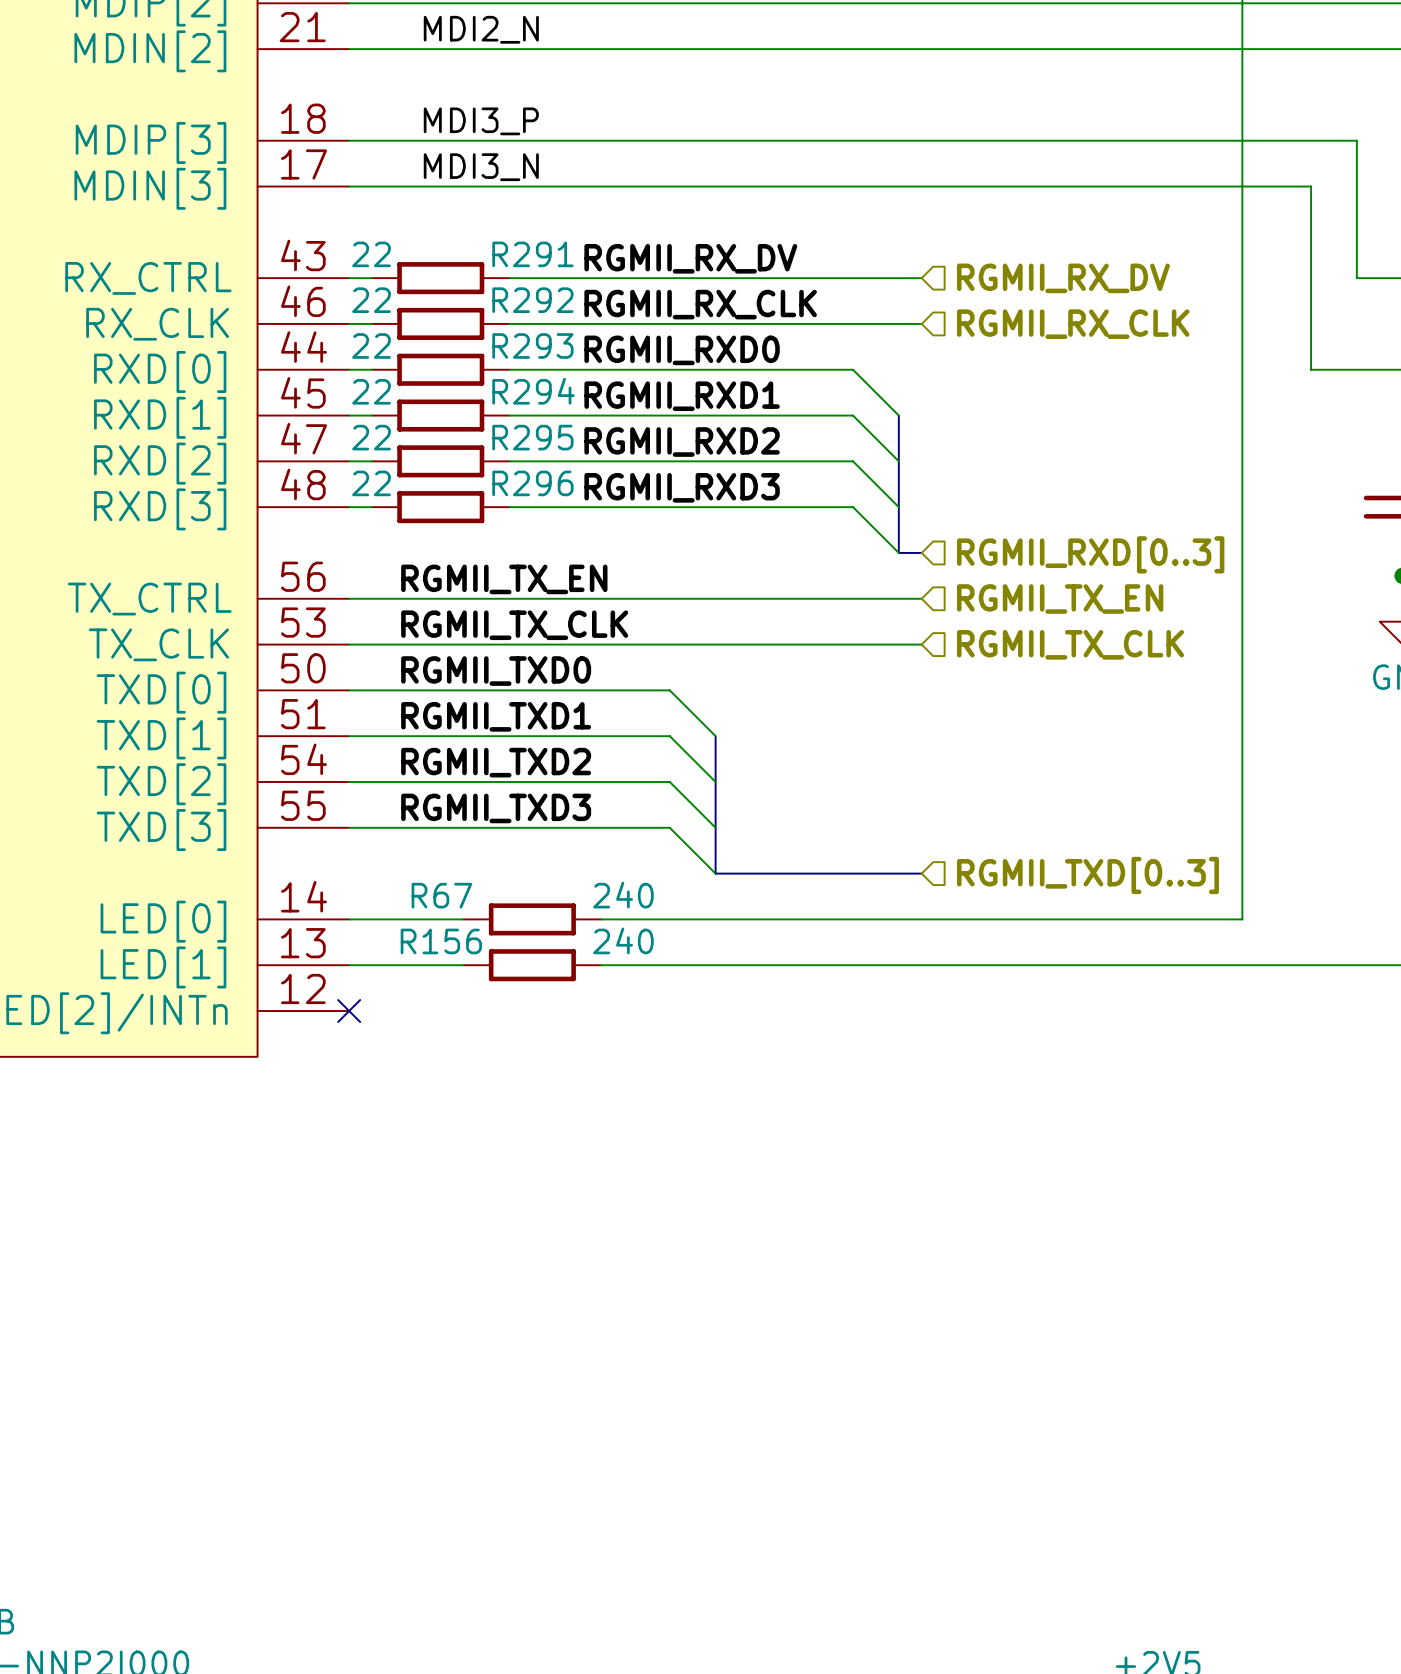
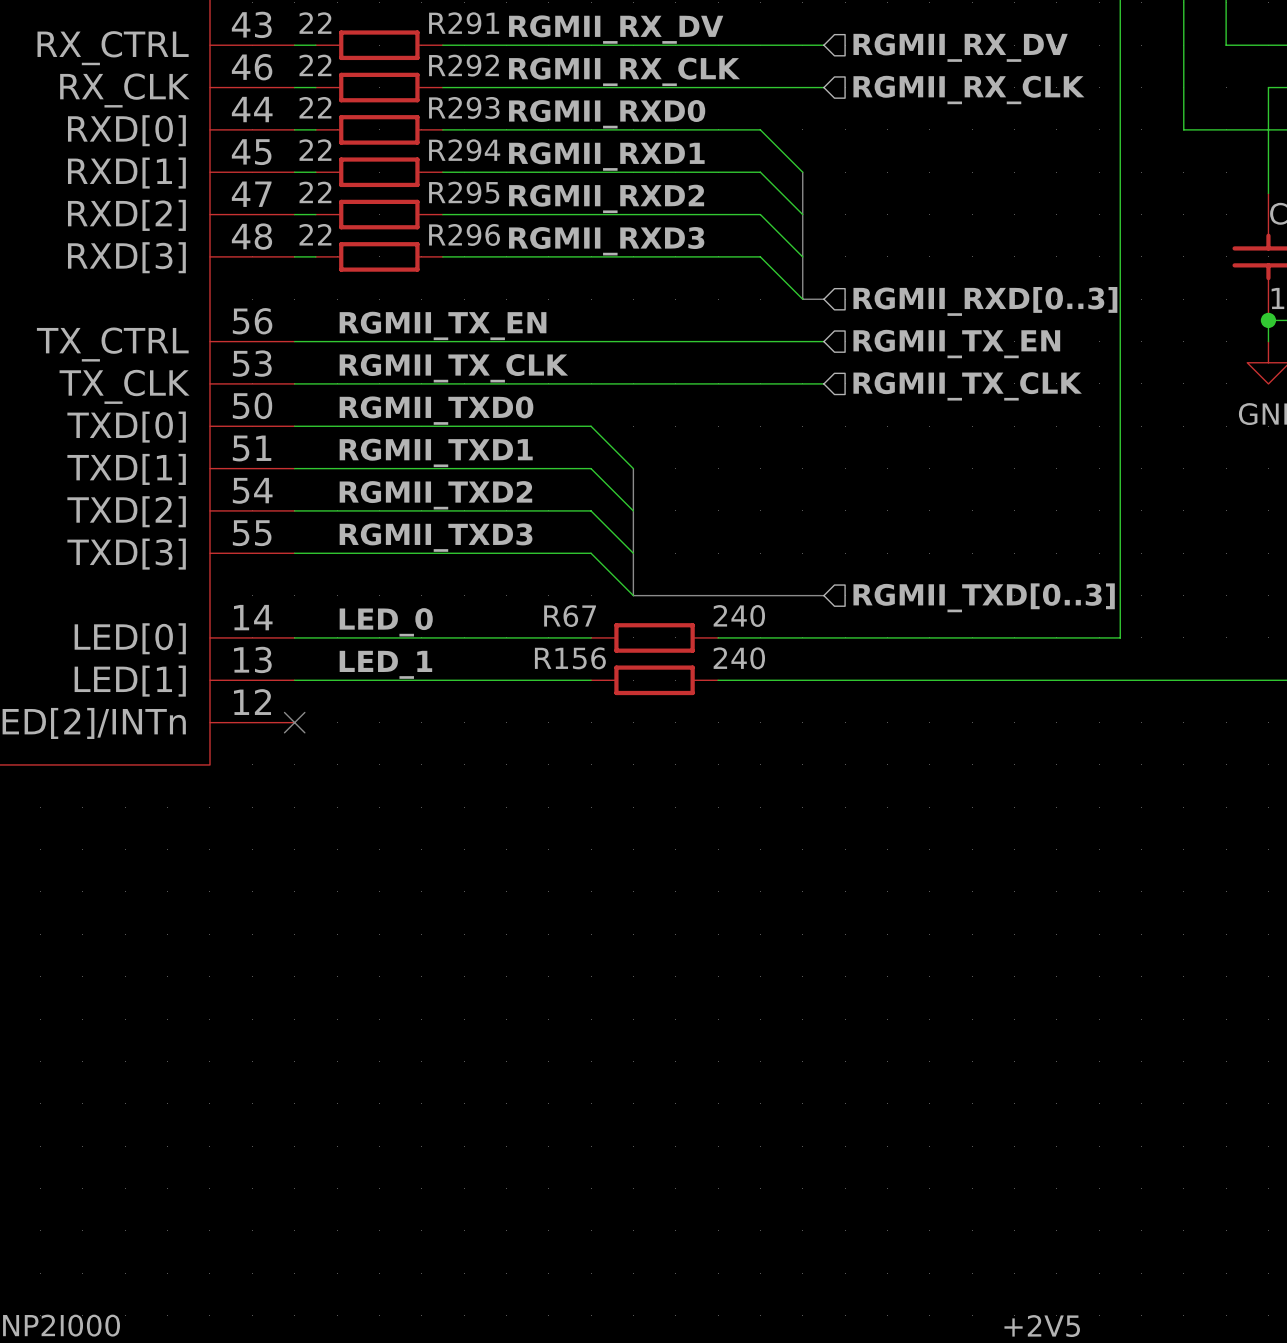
label: none -> LED_0 (386, 622)
R67 position: (532, 919) -> (654, 637)
wire: (669, 919) (807, 919) -> (400, 637) (527, 637)
label: none -> LED_1 (385, 664)
R156 position: (532, 965) -> (654, 680)
wire: (669, 965) (807, 965) -> (400, 680) (527, 680)

